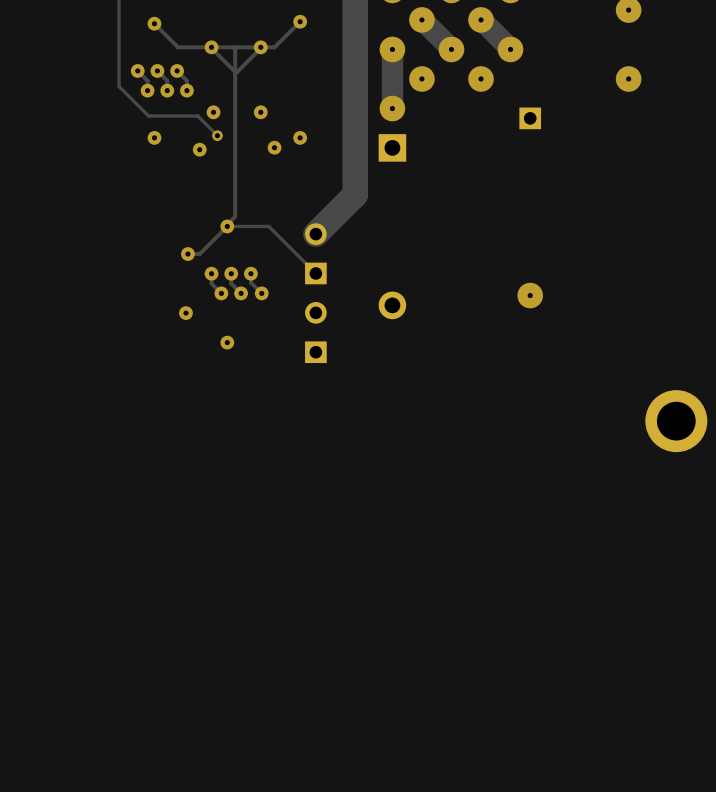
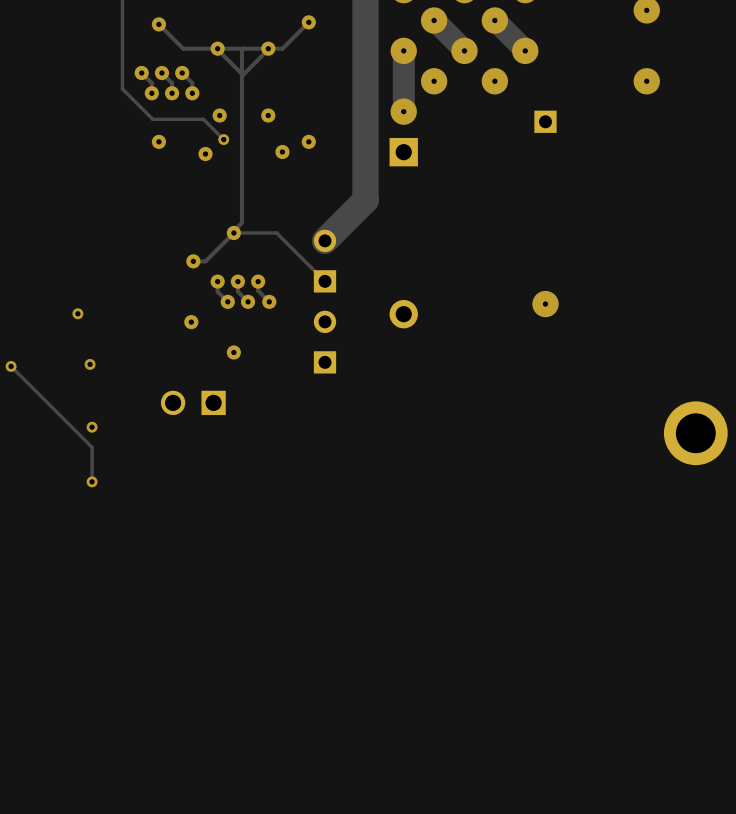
via: none -> (77, 313)
via: none -> (90, 364)
track: none -> (11, 366) (92, 447) (92, 481)
via: none -> (11, 366)
part: none -> (193, 402)
via: none -> (92, 427)
via: none -> (92, 481)

